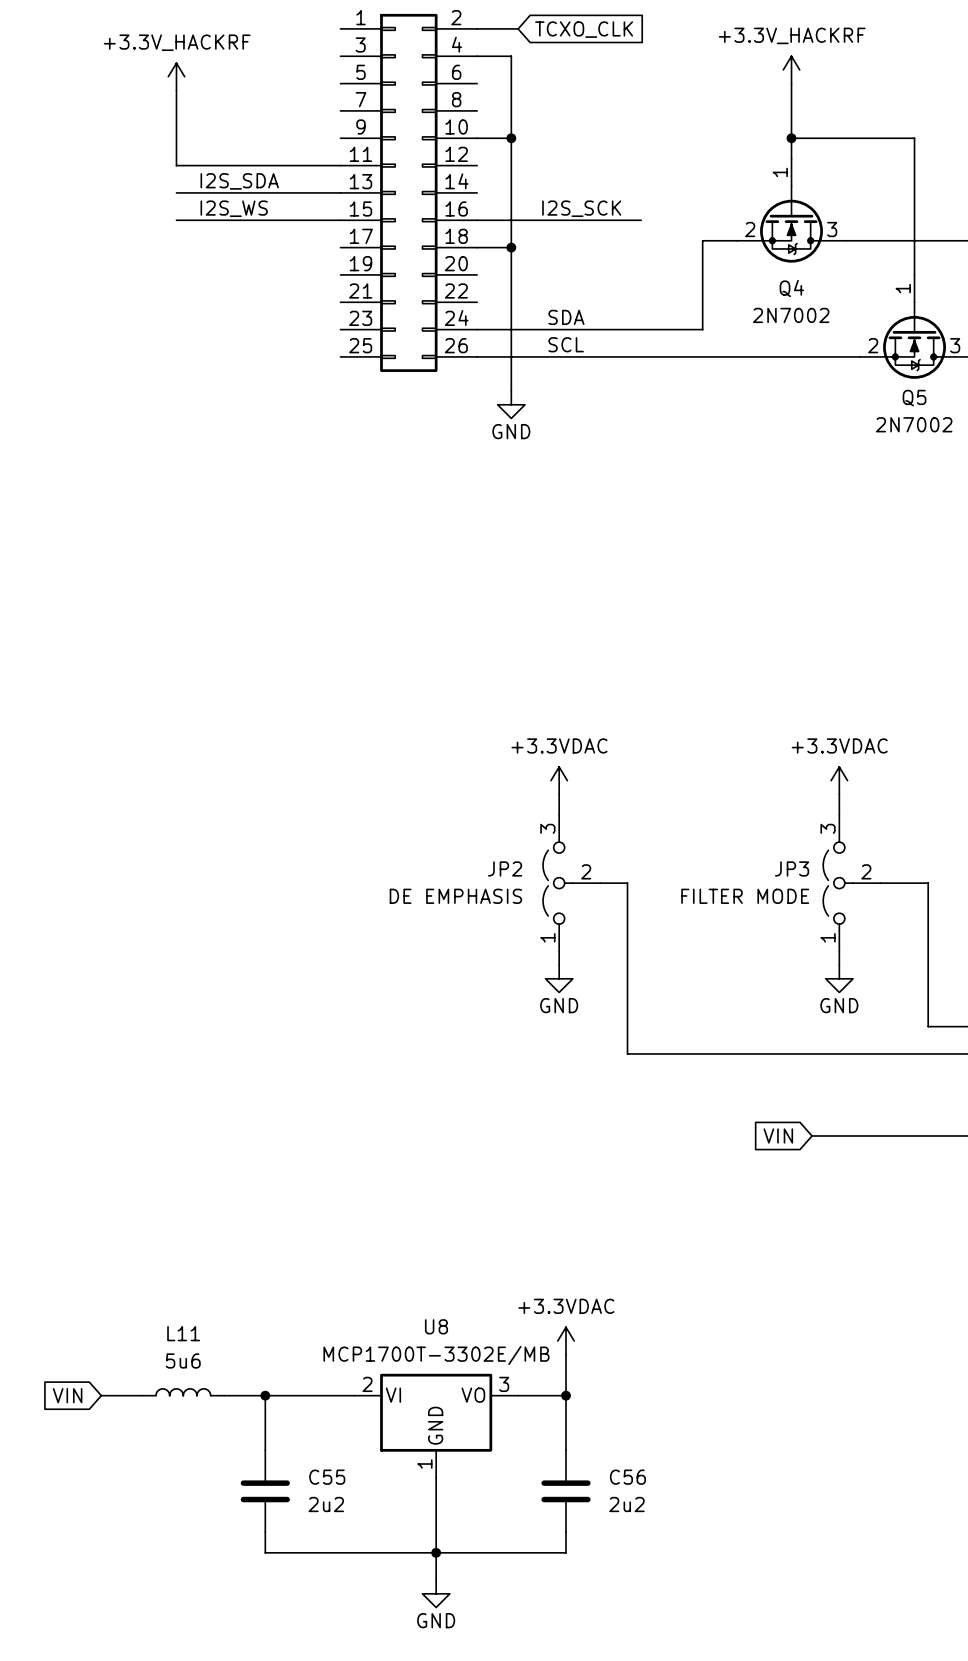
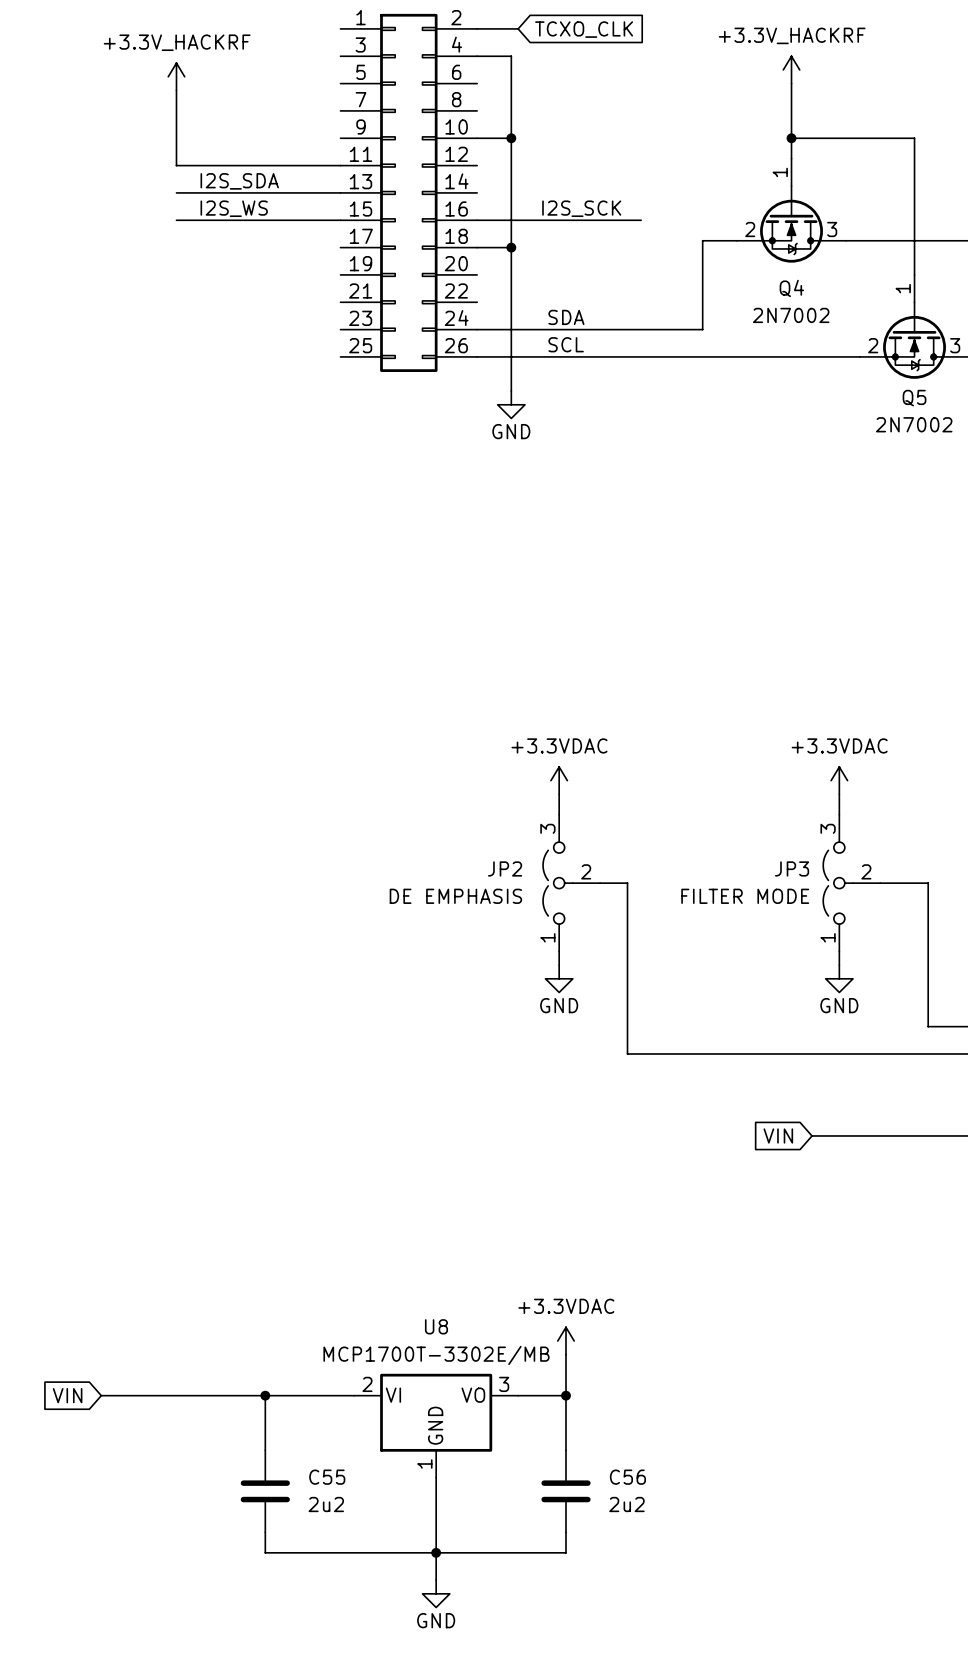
L11: 5u6 (183, 1392) -> none
wire: none -> (142, 1395) (224, 1395)

